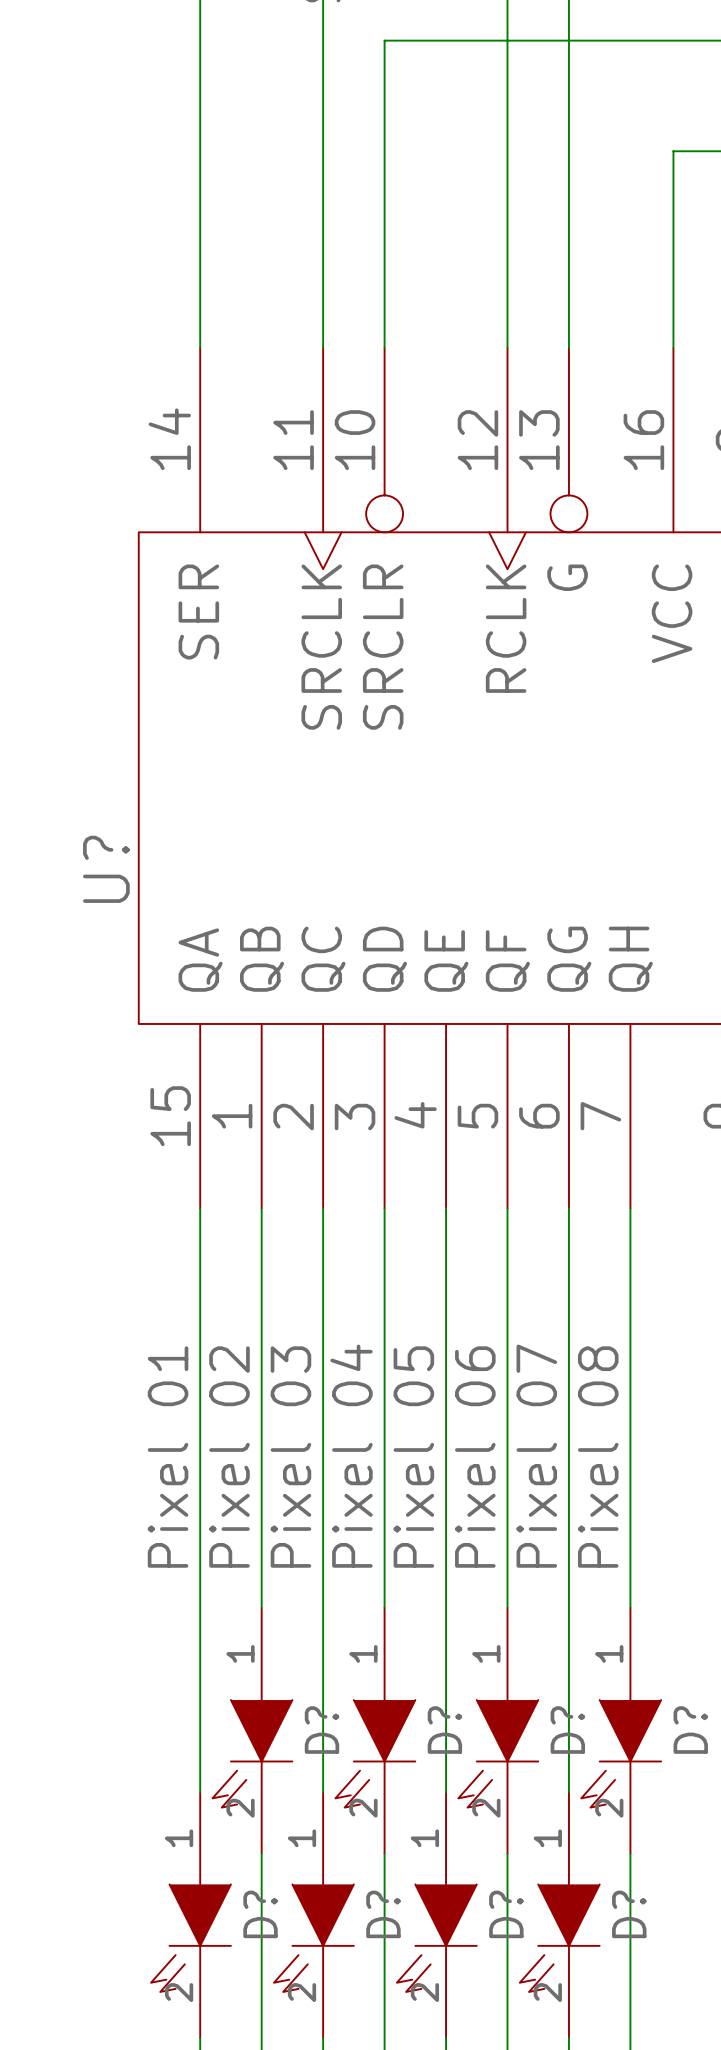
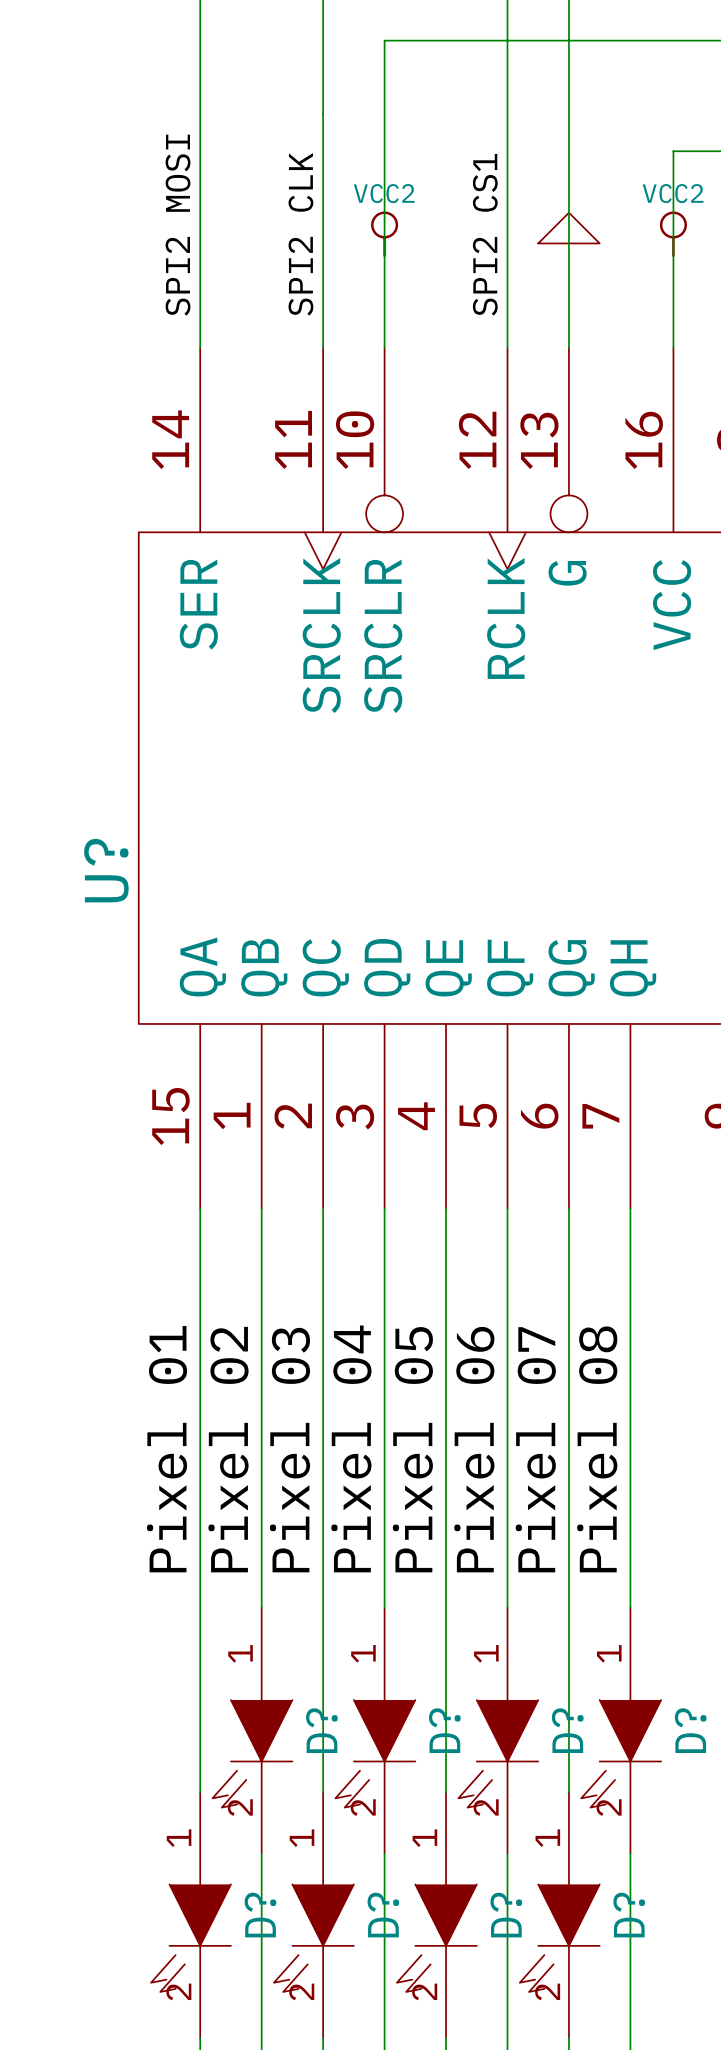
label: none -> SPI2 MOSI (178, 225)
power symbol: none -> (568, 228)
label: none -> SPI2 CS1 (485, 234)
label: none -> SPI2 CLK (300, 234)
power symbol: none -> VCC2 (384, 234)
power symbol: none -> VCC2 (673, 234)

